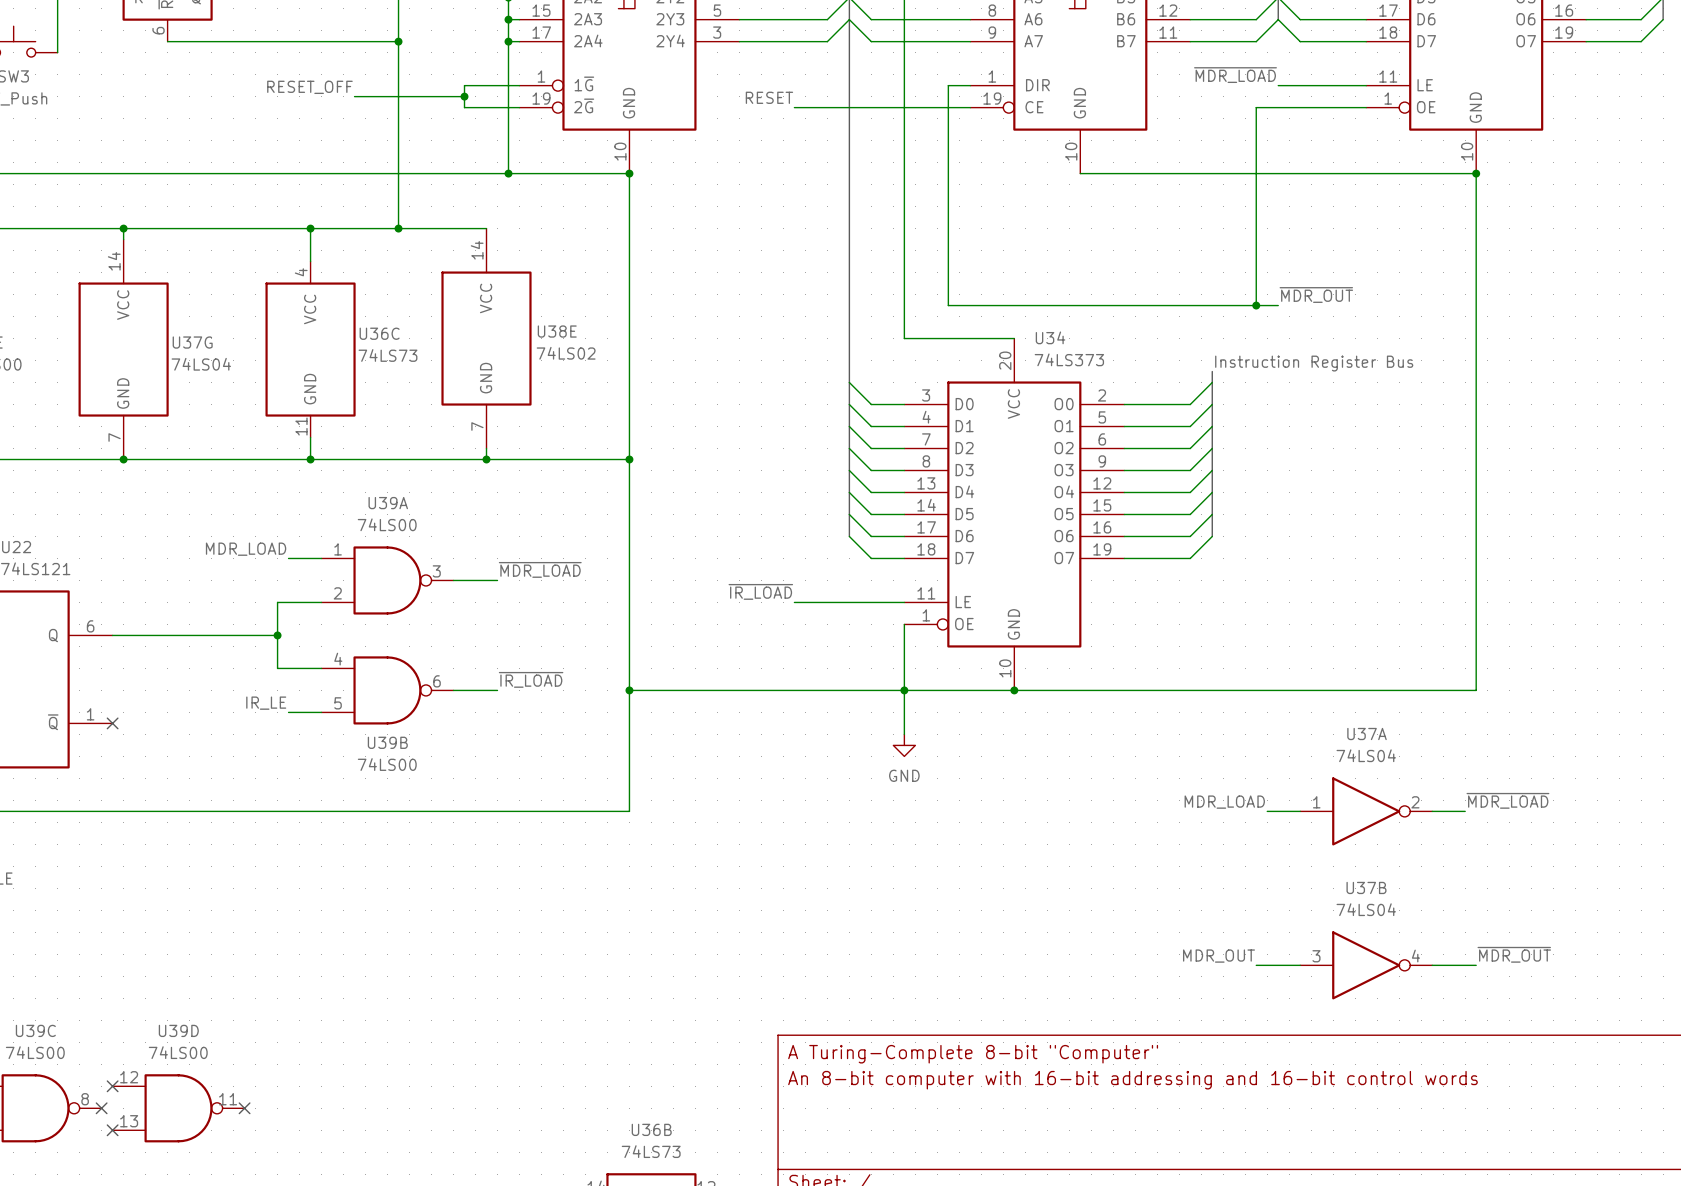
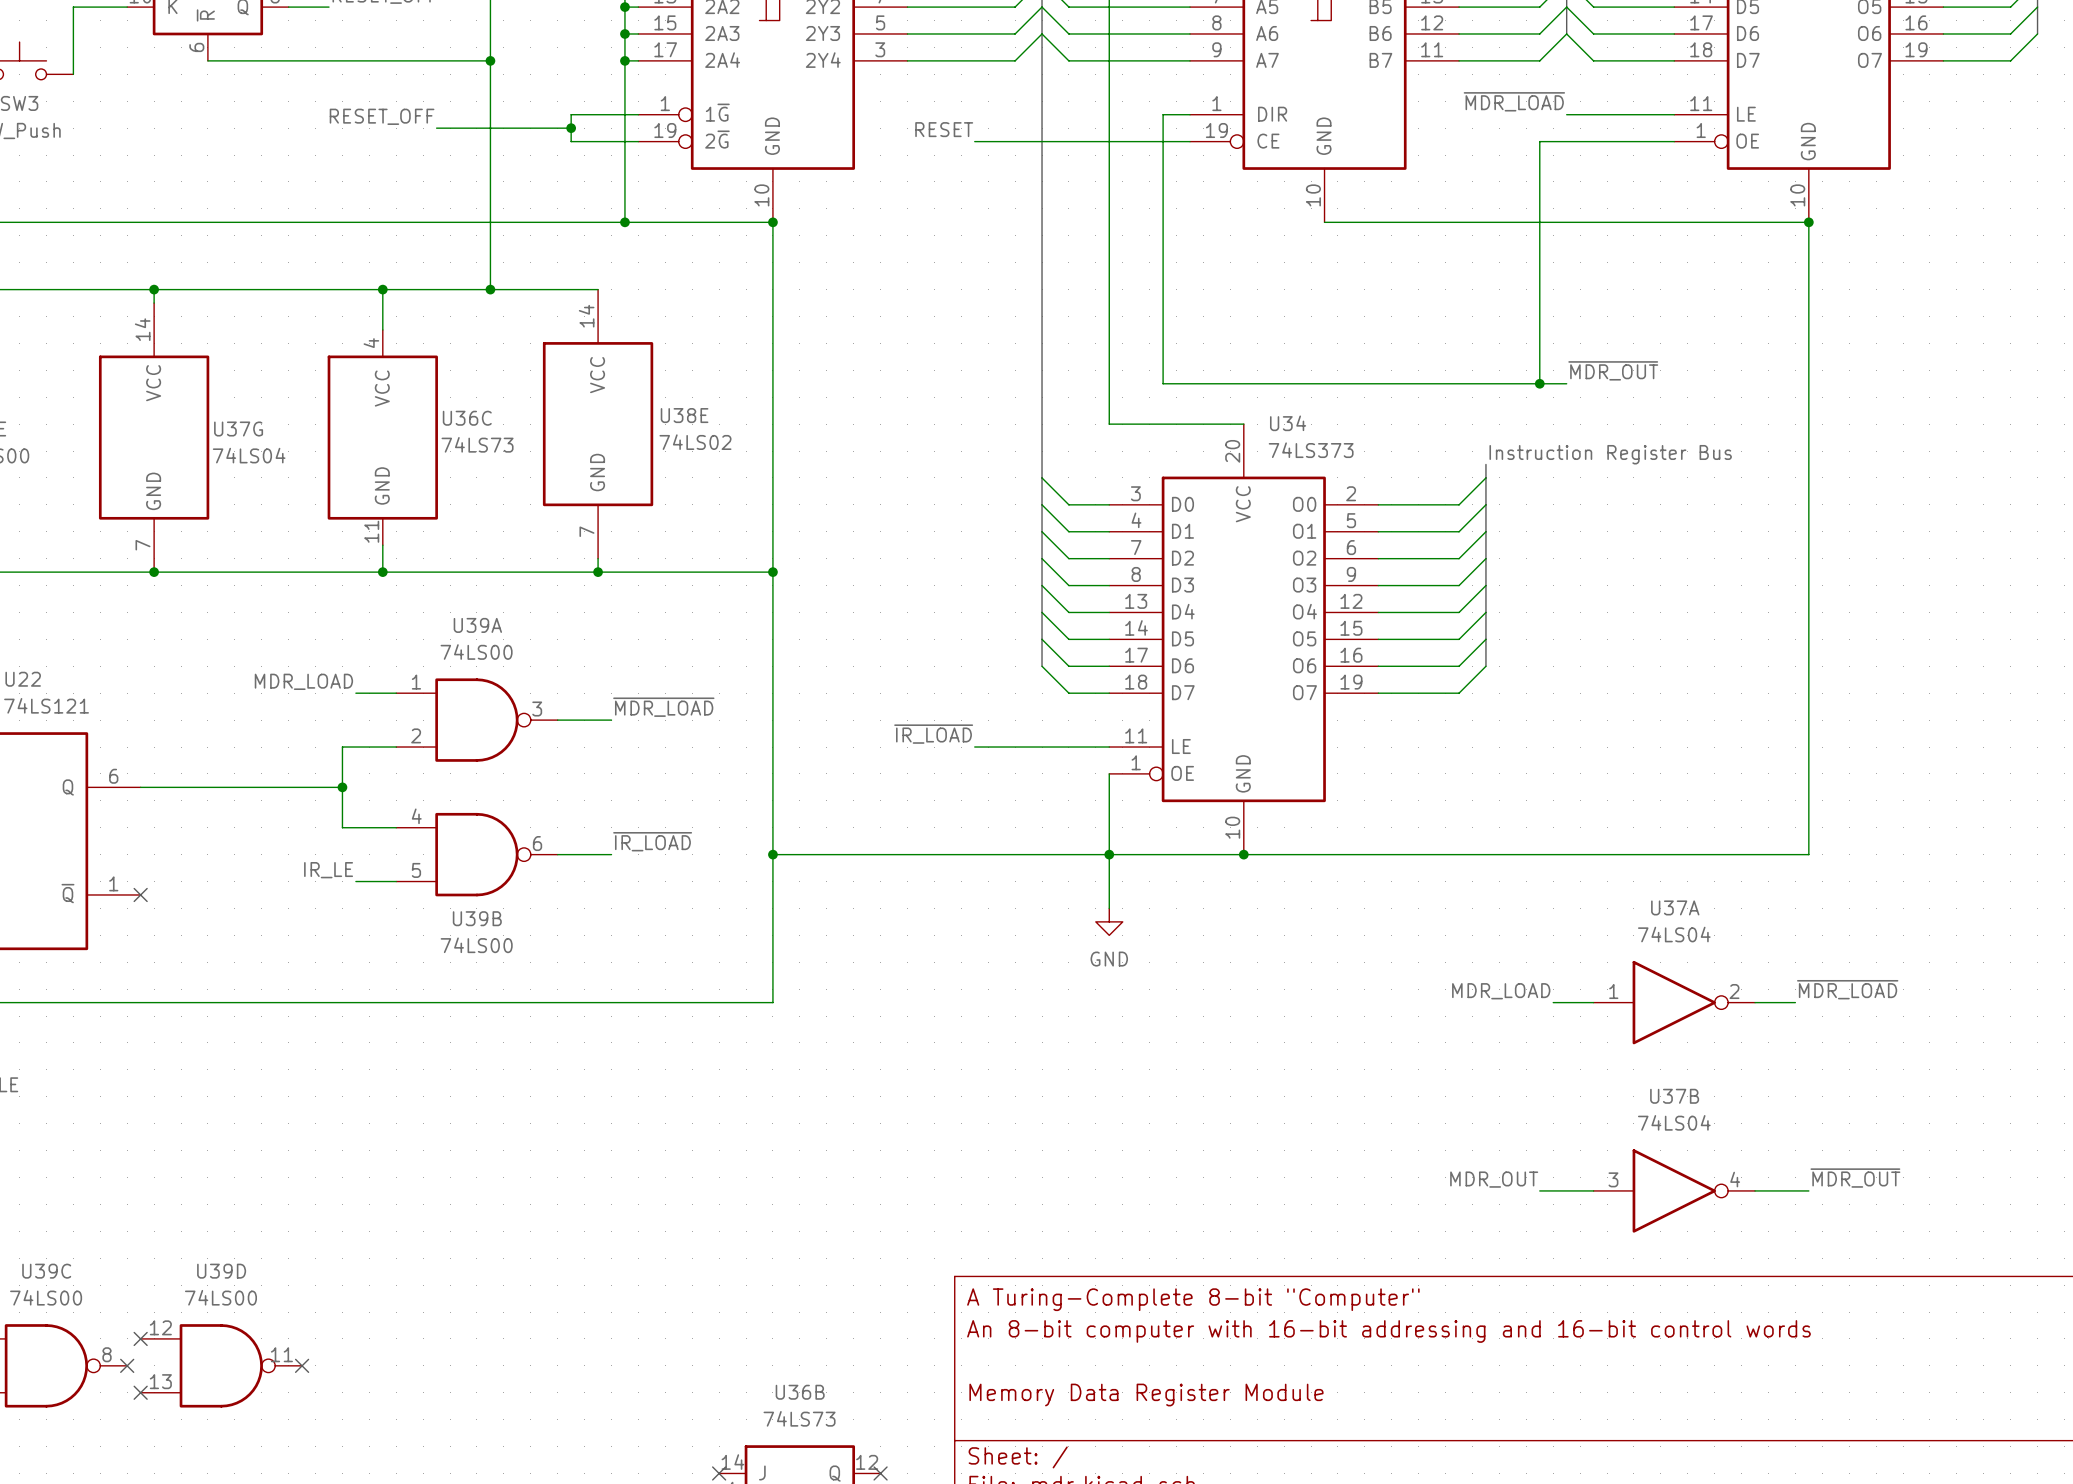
title block: none -> Memory Data Register Module (1146, 1395)

